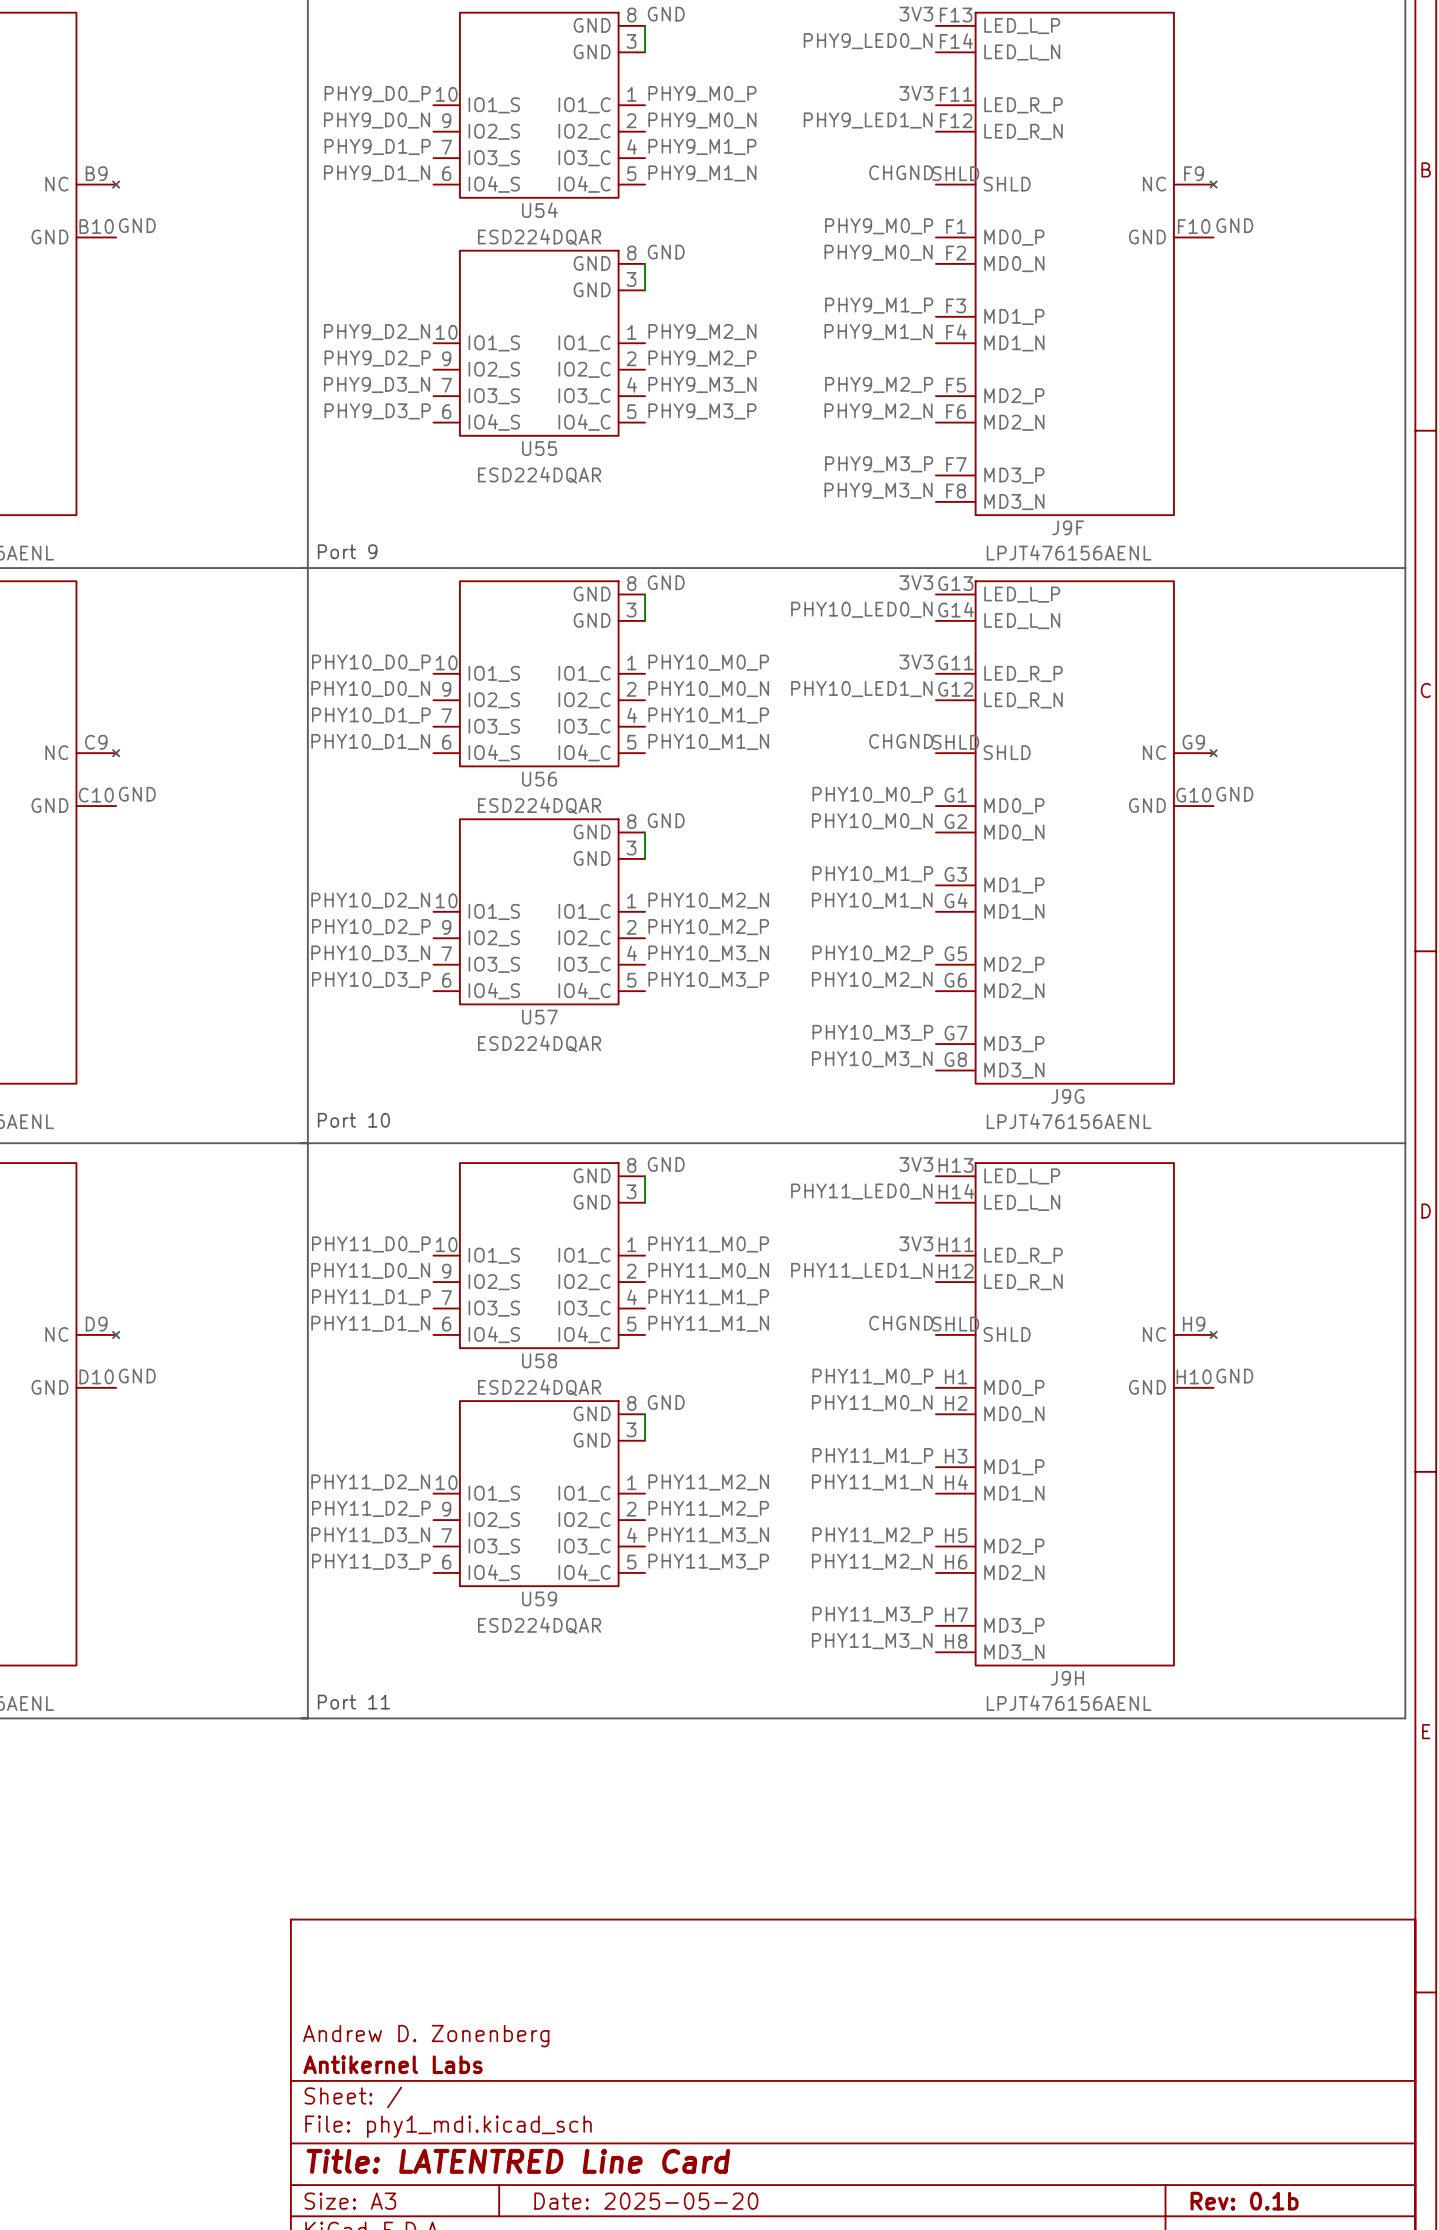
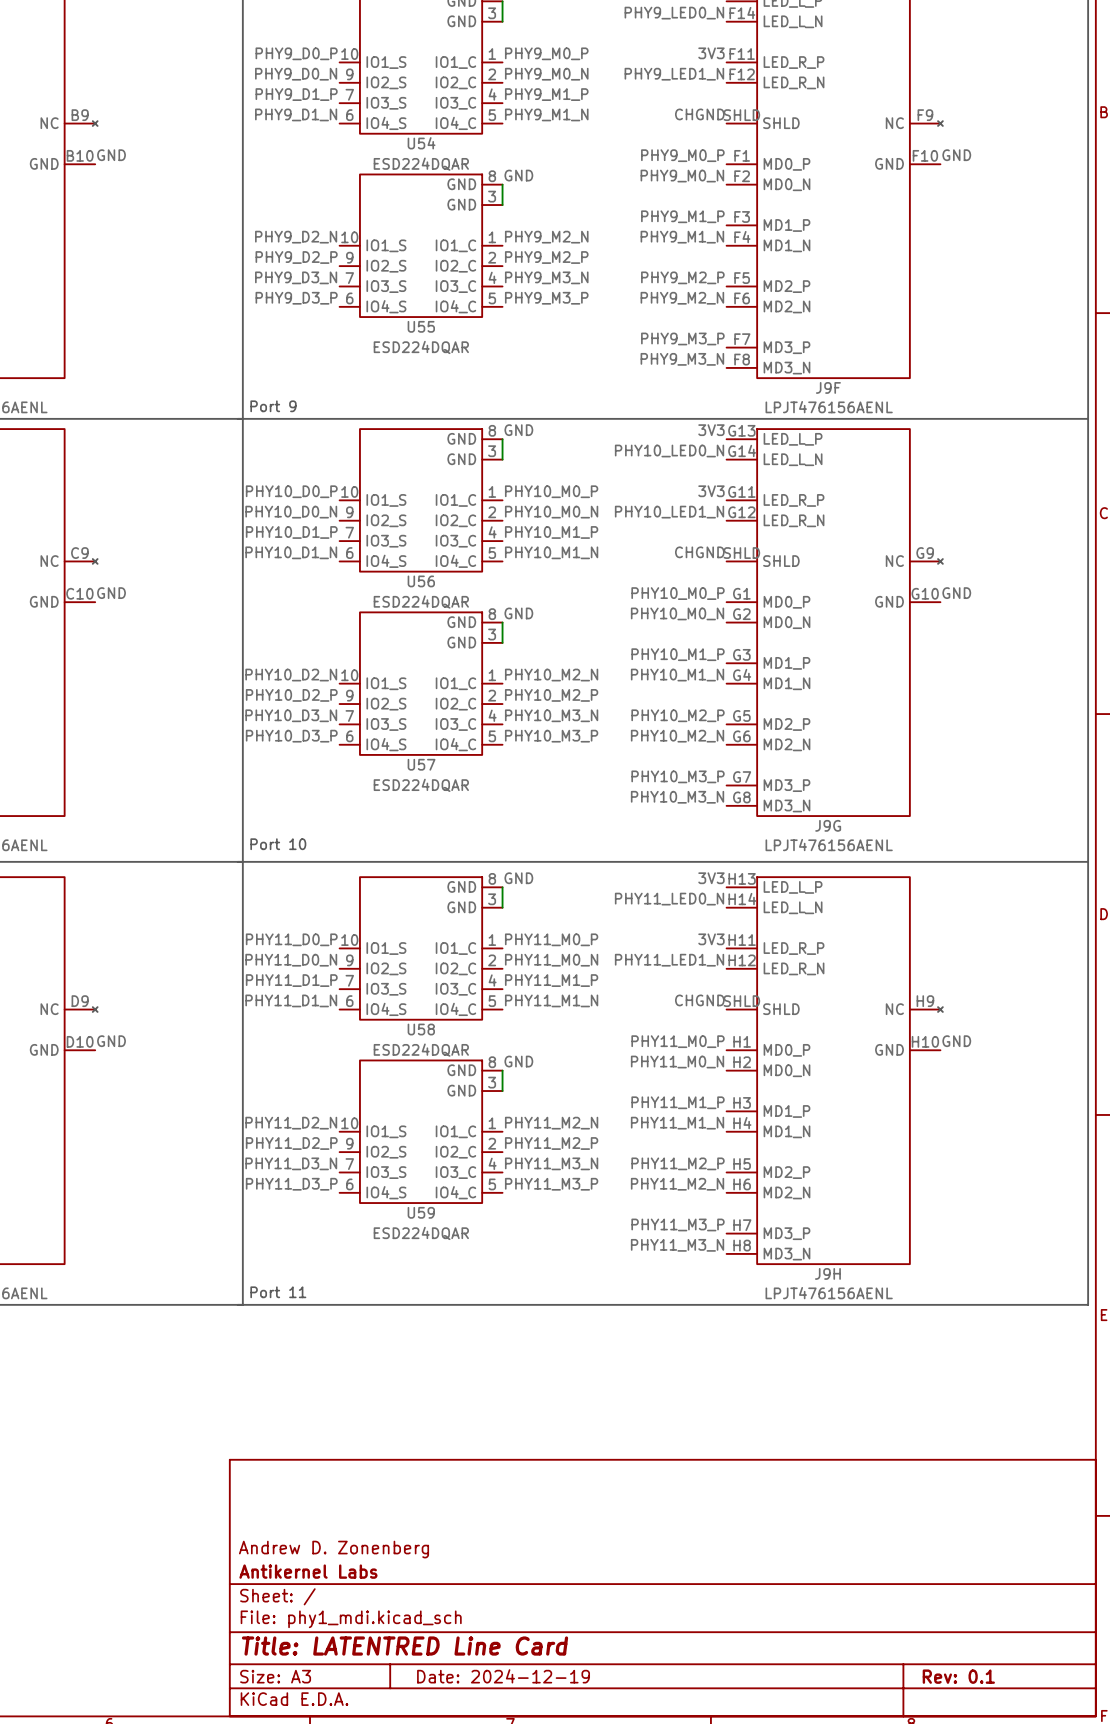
title block: Date: 2025-05-20 (646, 2201) -> Date: 2024-12-19 (503, 1676)
title block: Rev: 0.1b (1244, 2201) -> Rev: 0.1 (958, 1676)

